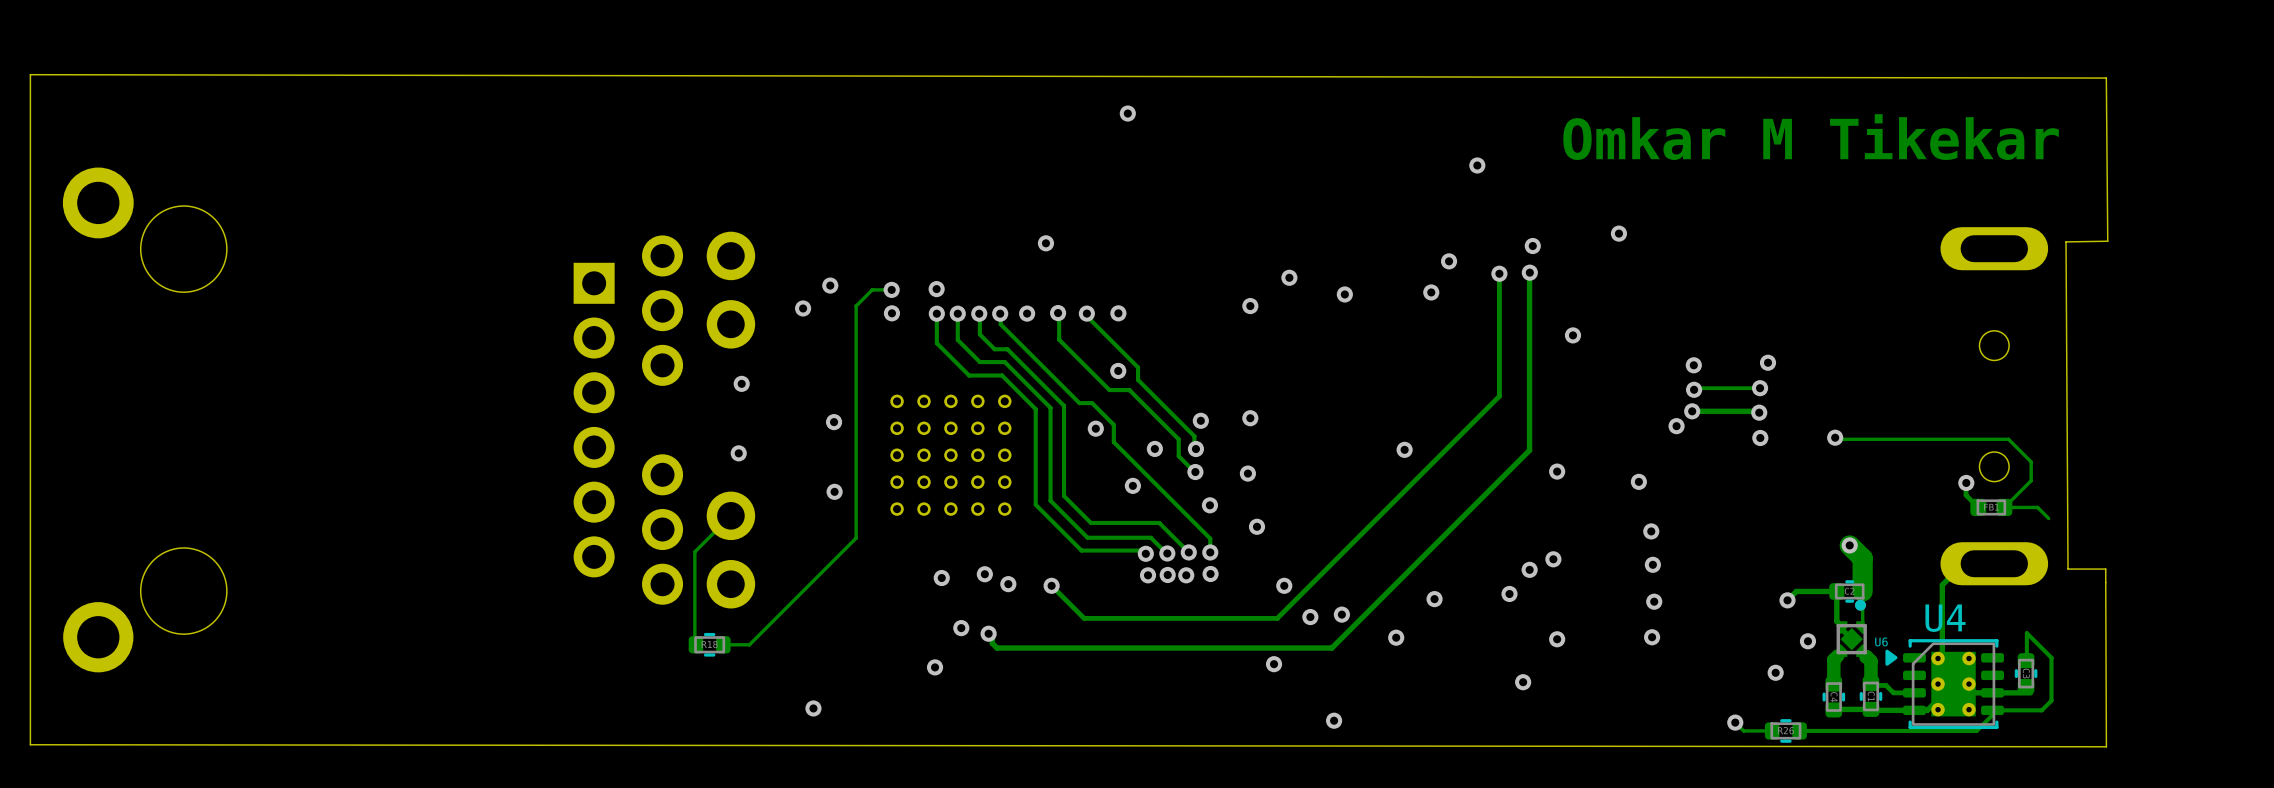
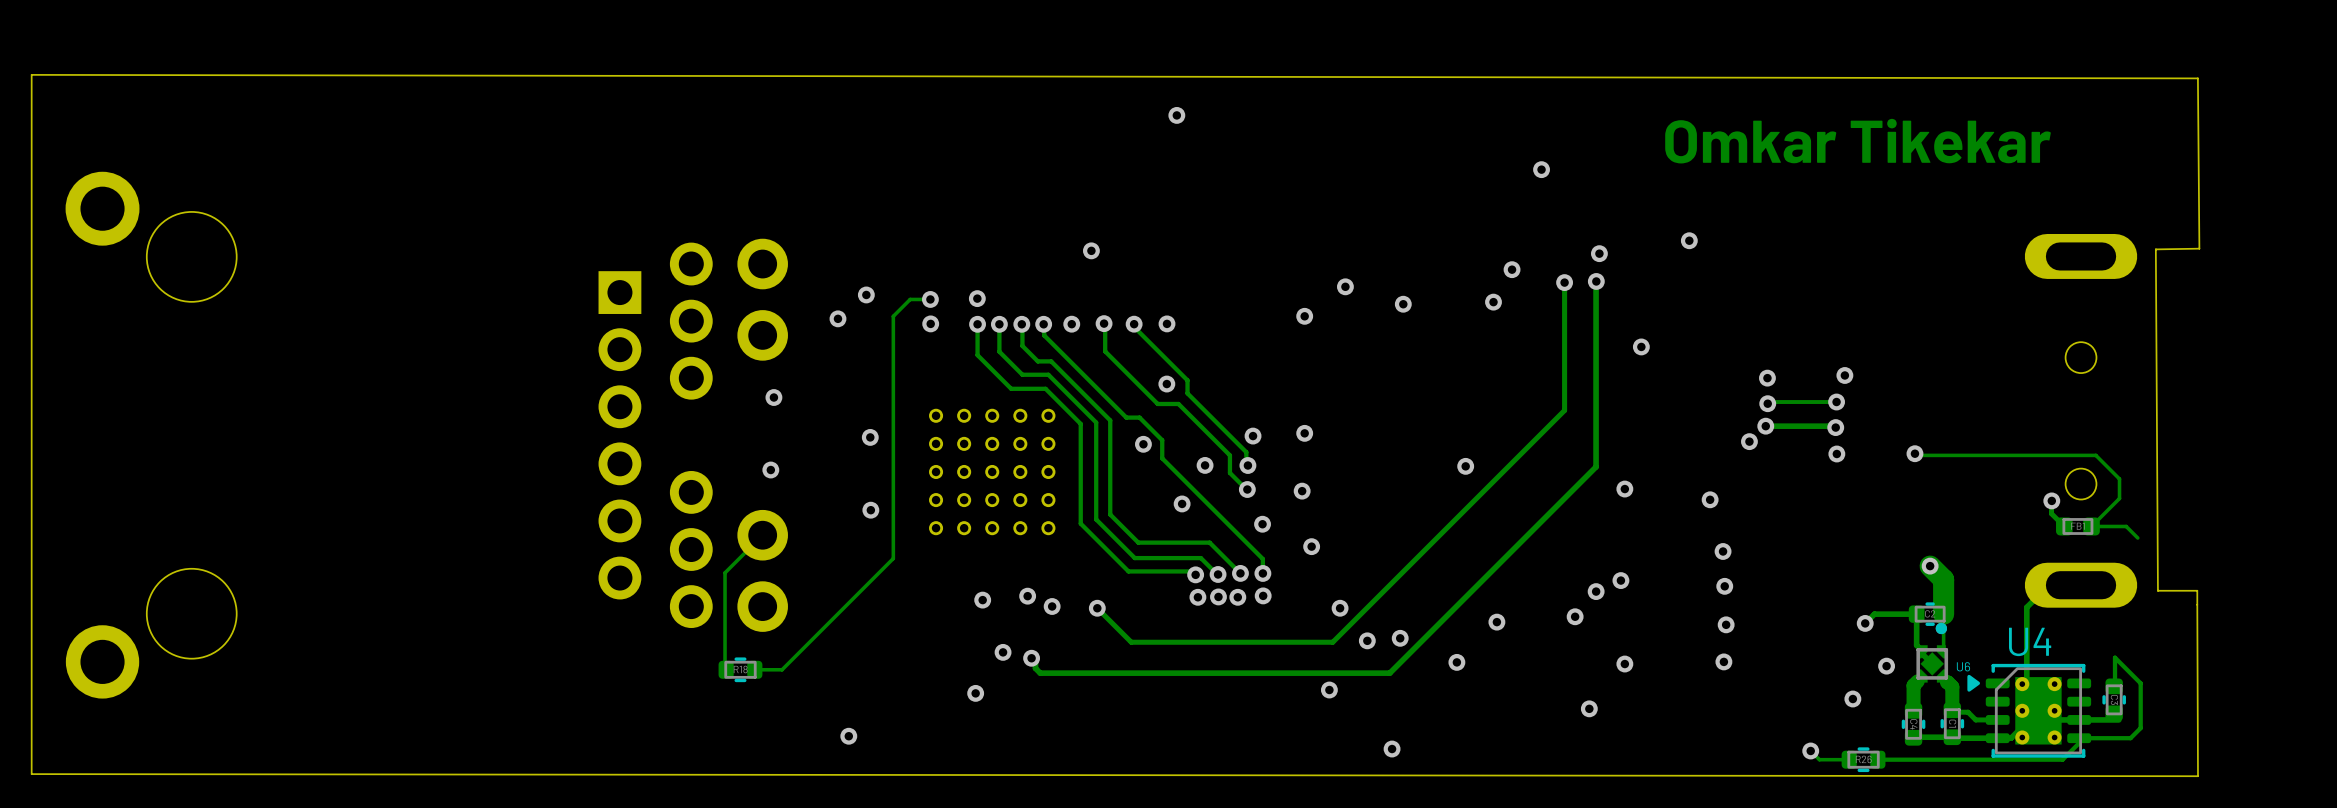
text: Omkar M Tikekar (1811, 137) -> Omkar Tikekar (1858, 141)

